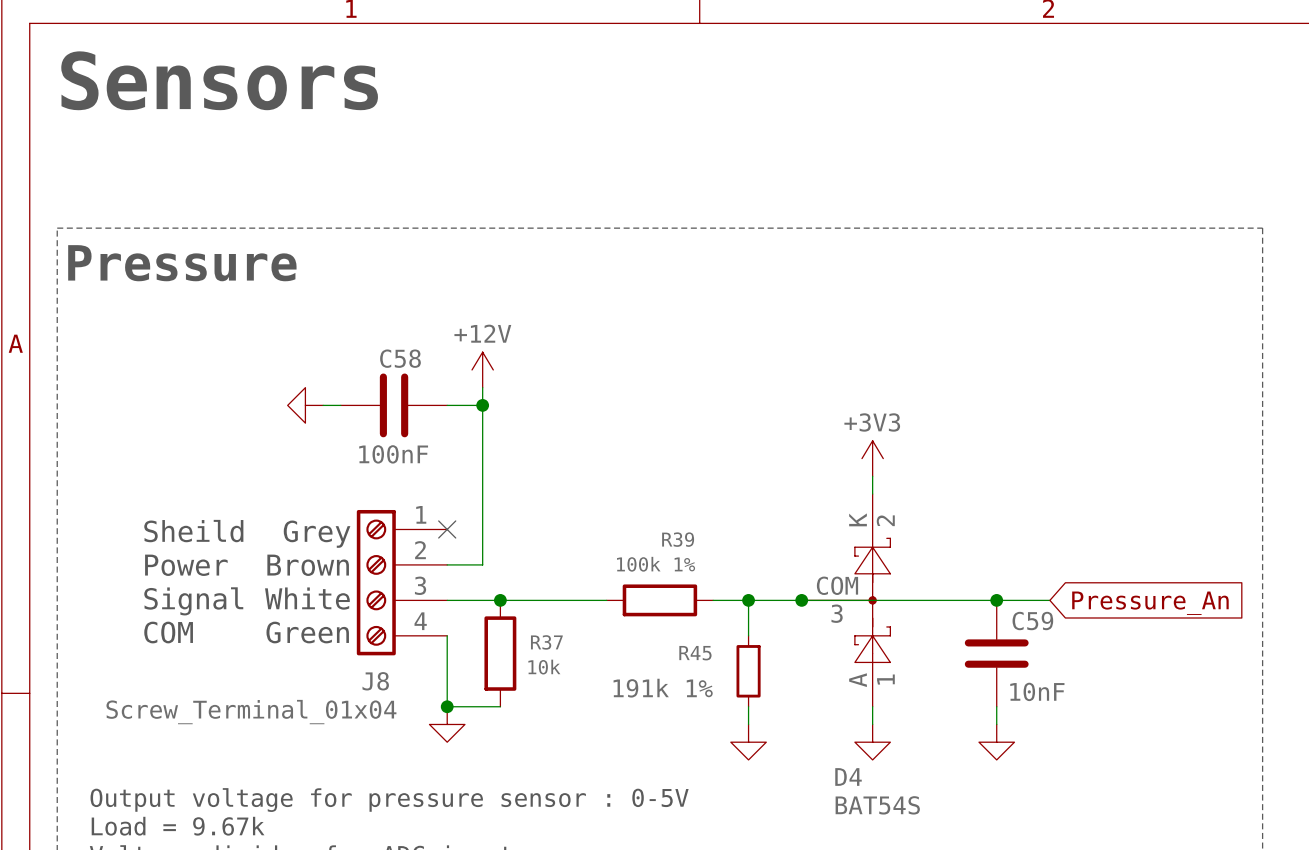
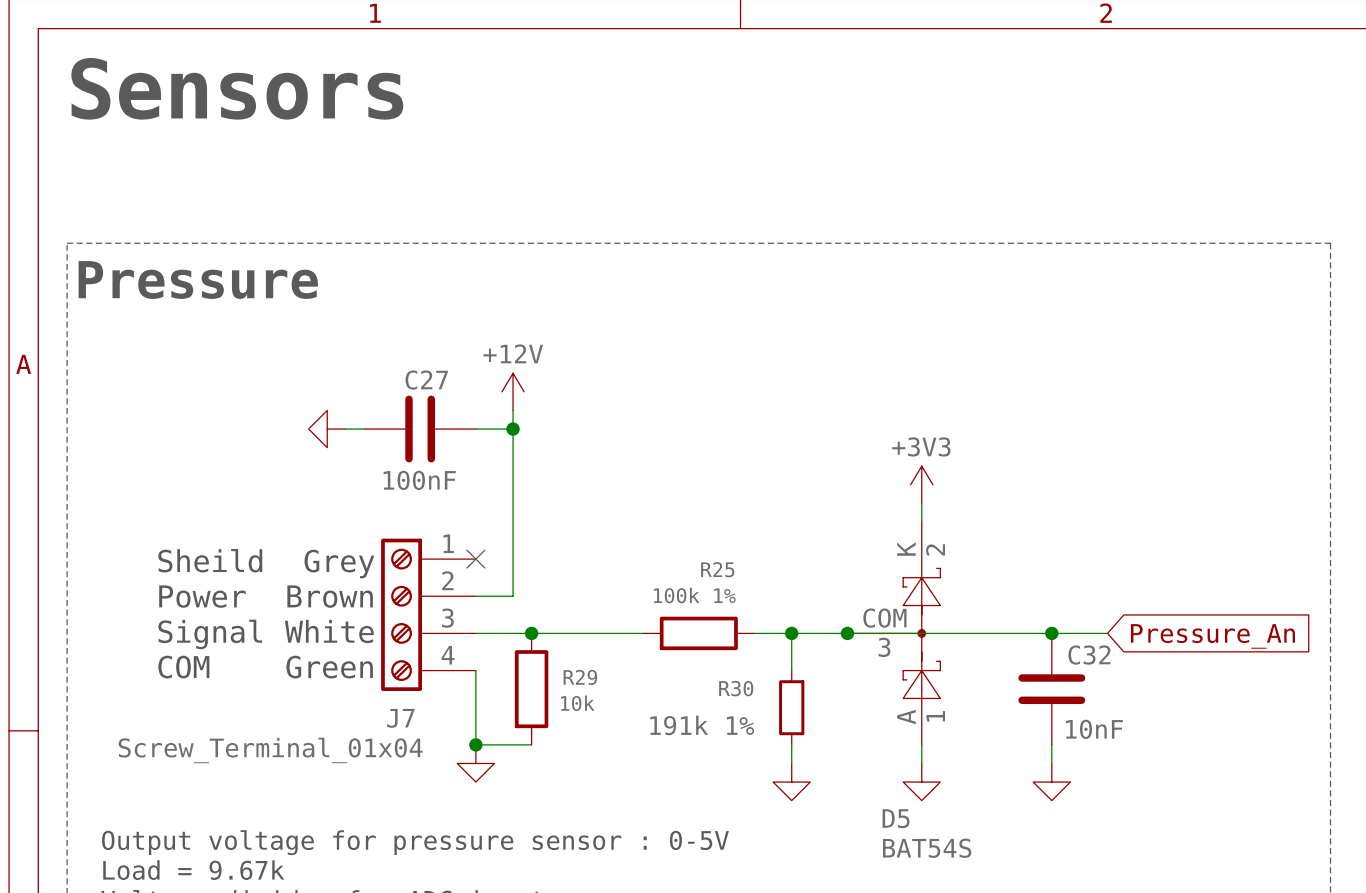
C58 name: C58 (400, 358) -> C27 (426, 380)
R39 name: R39 (678, 539) -> R25 (717, 569)
C59 name: C59 (1032, 621) -> C32 (1089, 655)
R37 name: R37 (546, 642) -> R29 (580, 677)
R45 name: R45 (695, 653) -> R30 (736, 688)
J8 name: J8 (375, 681) -> J7 (400, 718)
D4 name: D4 (848, 776) -> D5 (896, 818)

